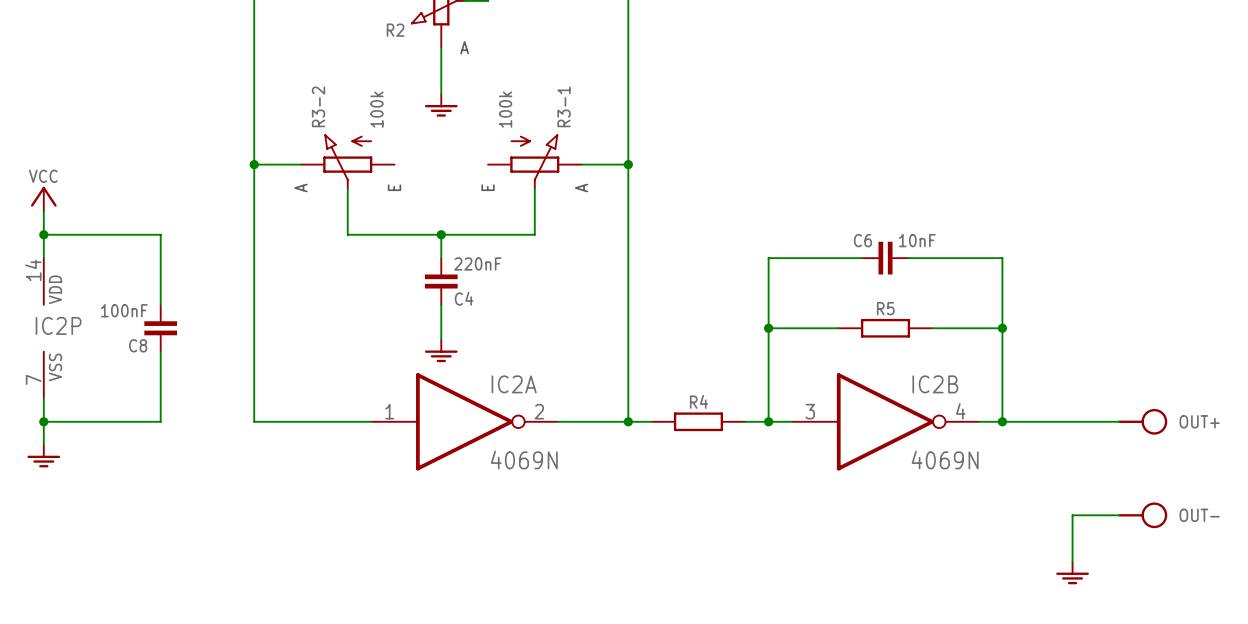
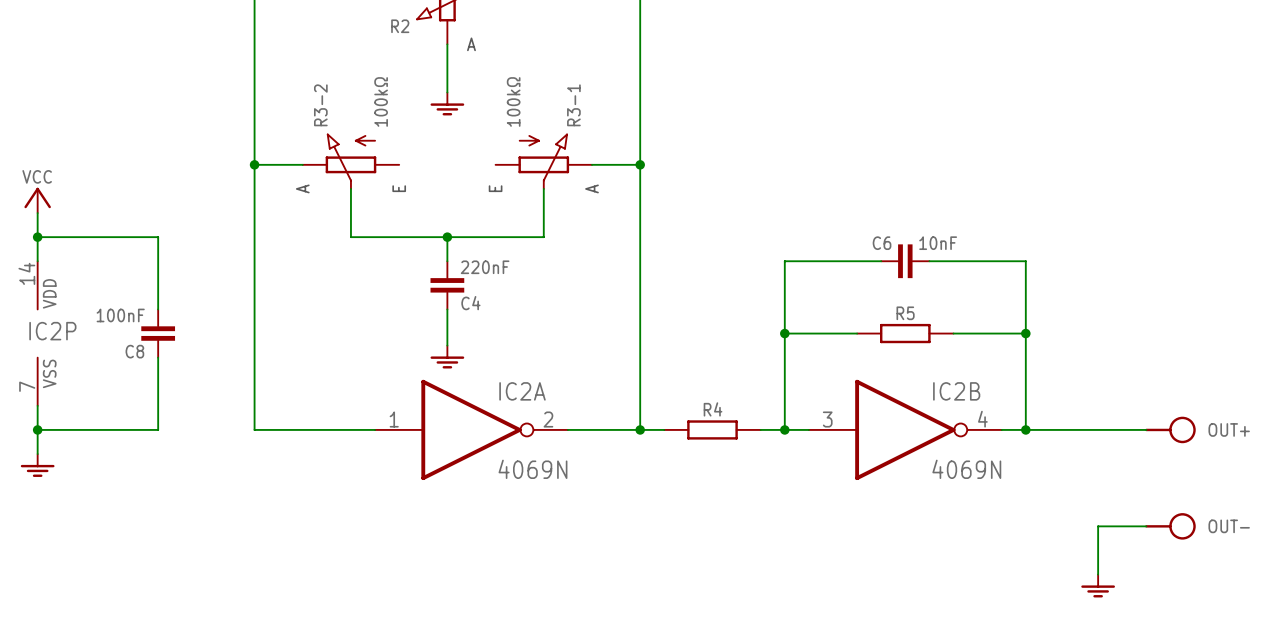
R3-2 value: 100k (376, 109) -> 100kΩ (381, 101)
R3-1 value: 100k (505, 109) -> 100kΩ (513, 101)

